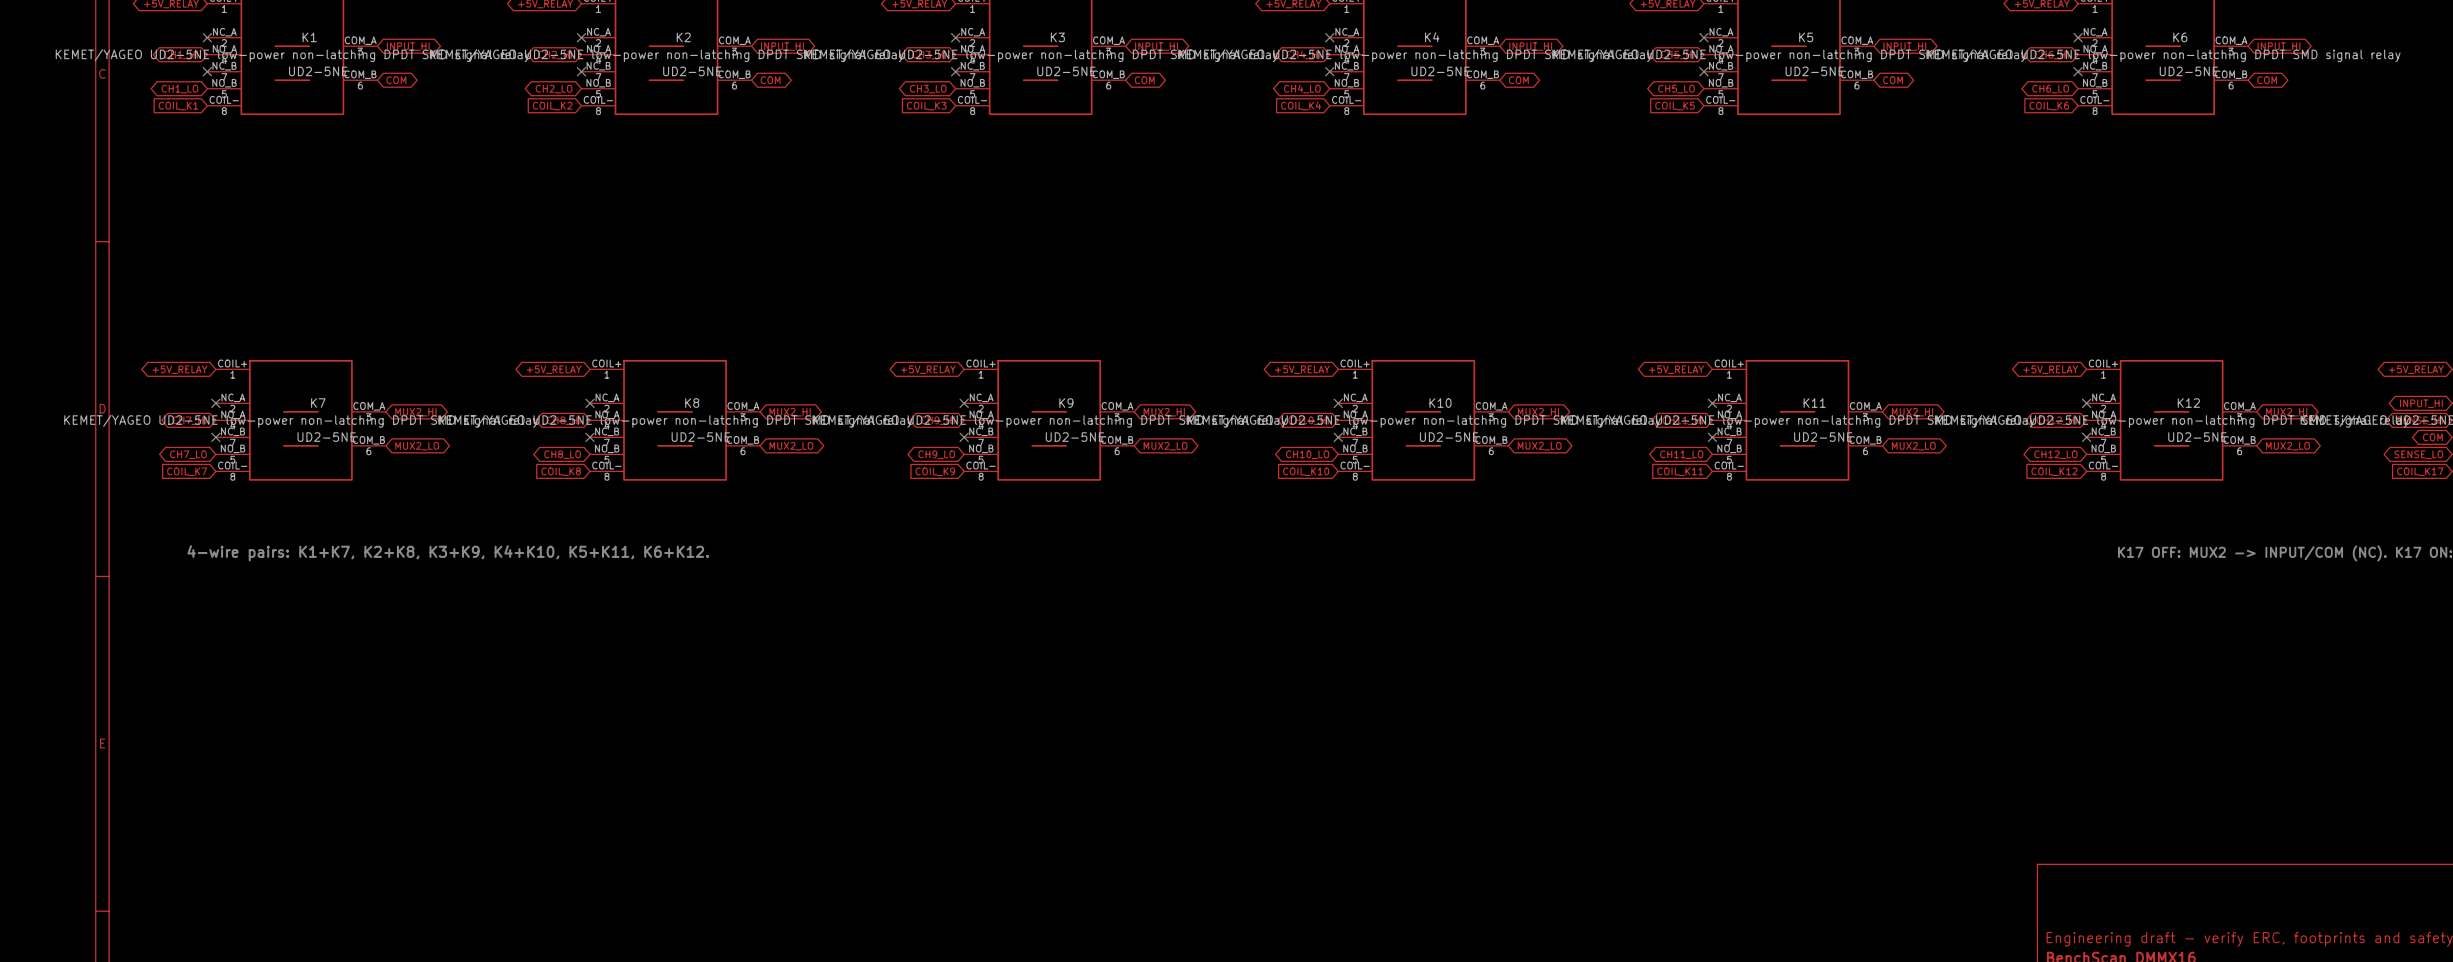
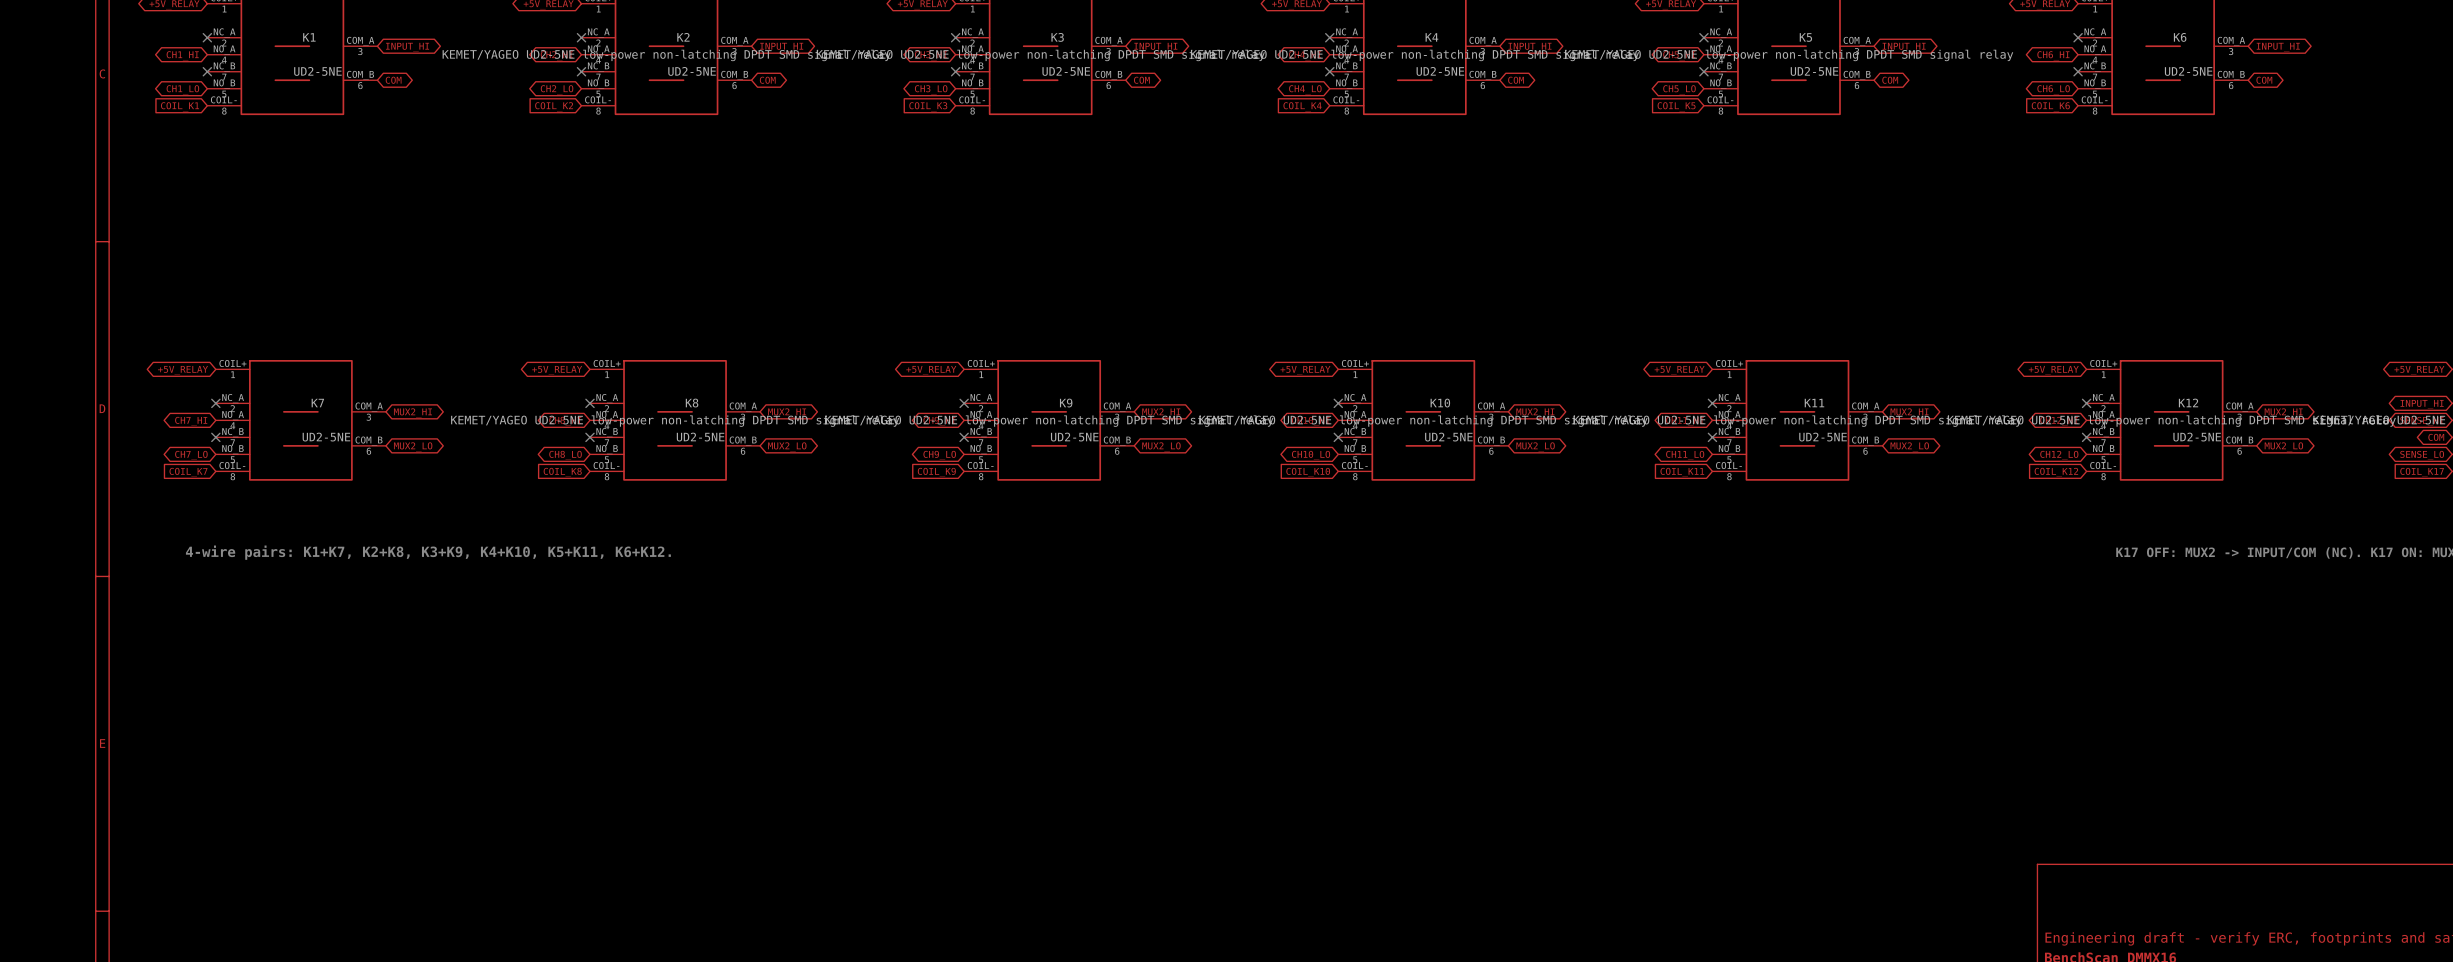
K1 text: KEMET/YAGEO UD2-5NE low-power non-latching DPDT SMD signal relay (292, 55) -> none
K6 text: KEMET/YAGEO UD2-5NE low-power non-latching DPDT SMD signal relay (2163, 55) -> none
K7 text: KEMET/YAGEO UD2-5NE low-power non-latching DPDT SMD signal relay (301, 421) -> none

